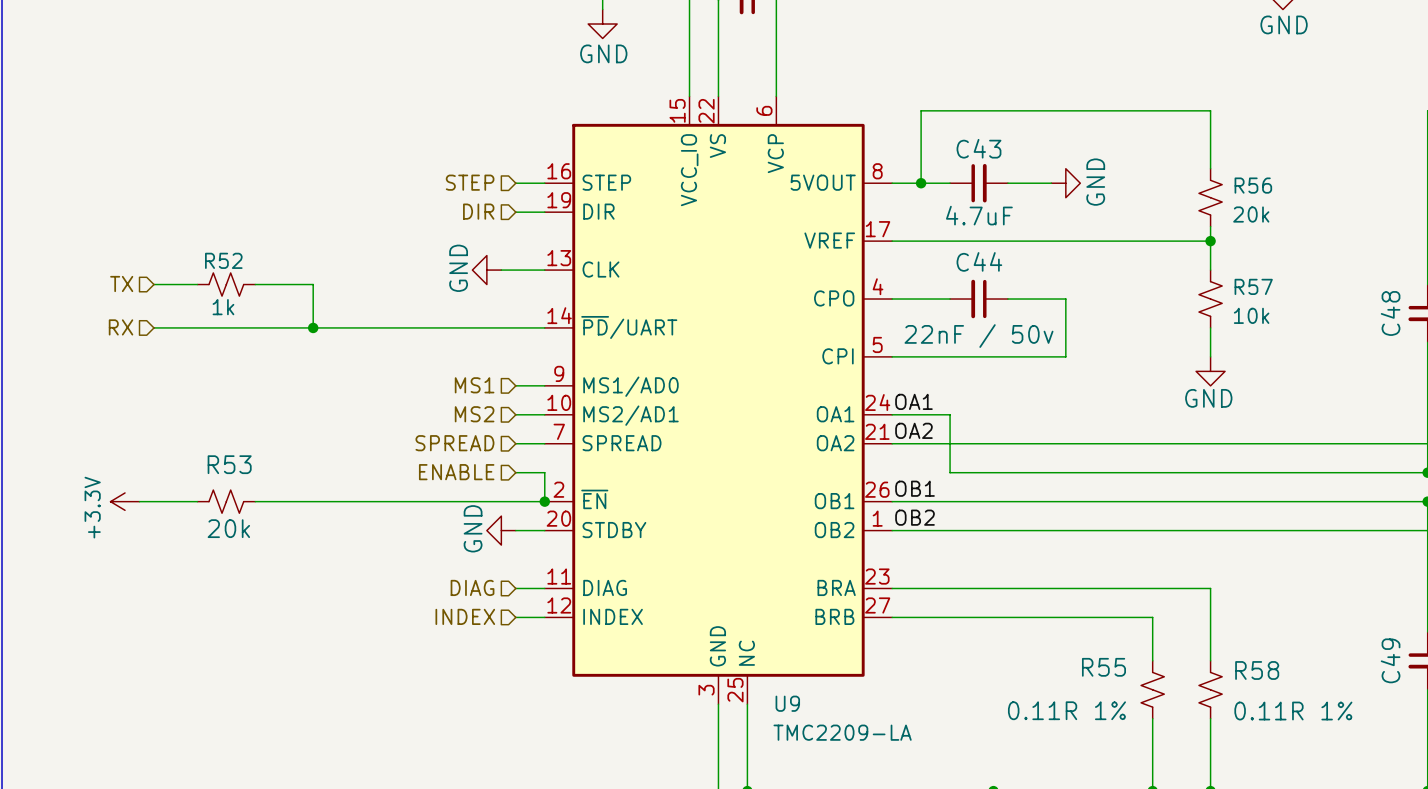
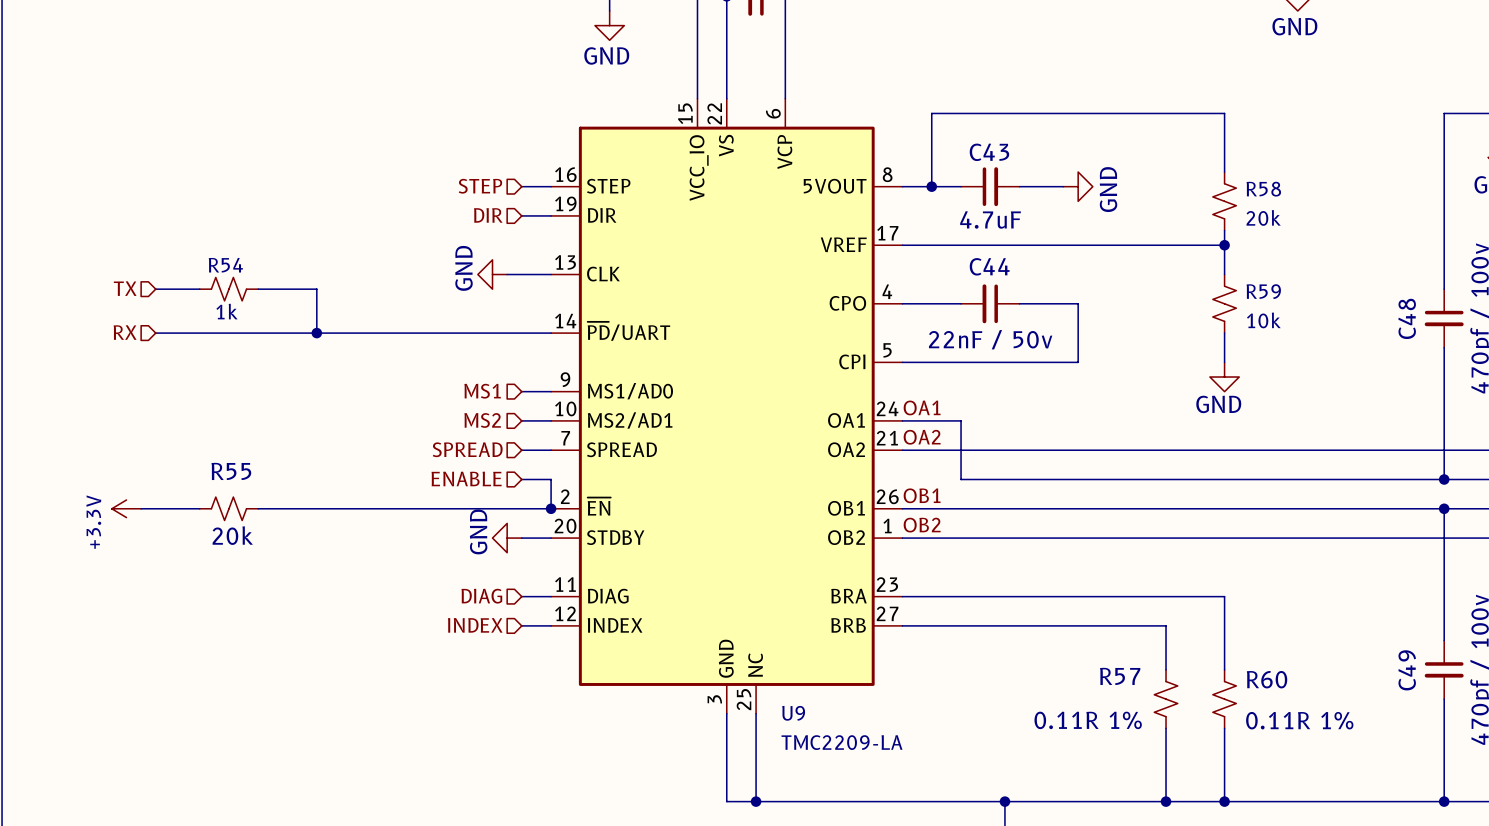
R56 name: R56 (1253, 185) -> R58 (1263, 189)
R52 name: R52 (223, 260) -> R54 (225, 265)
R57 name: R57 (1253, 286) -> R59 (1263, 291)
R53 name: R53 (229, 464) -> R55 (231, 471)
R55 name: R55 (1103, 667) -> R57 (1120, 676)
R58 name: R58 (1257, 670) -> R60 (1267, 679)

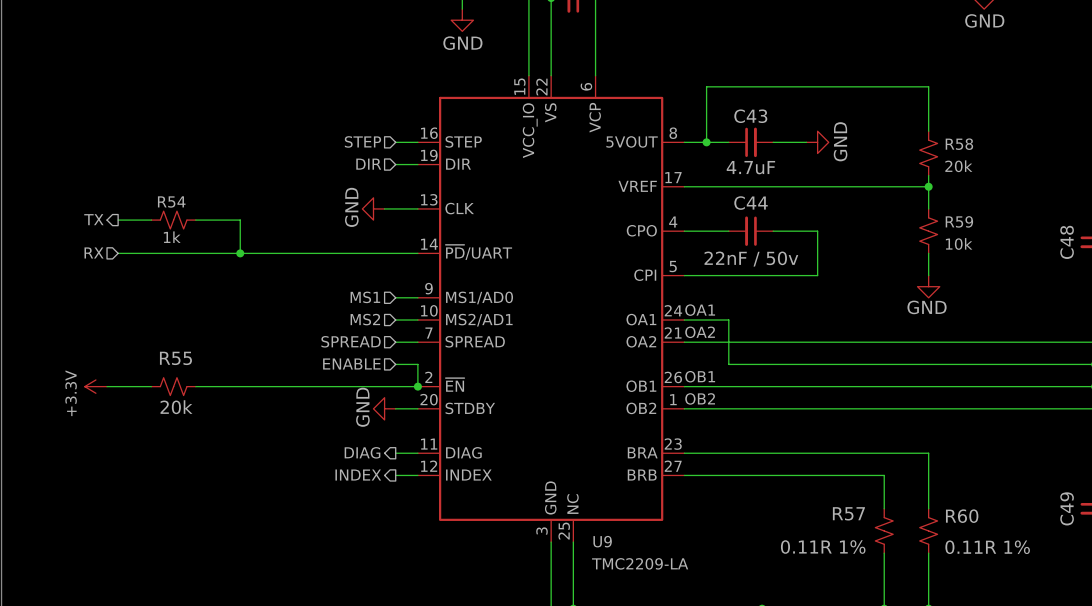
hierarchical label shape: input (125, 288) -> output (93, 219)
hierarchical label shape: input (481, 596) -> output (362, 452)
hierarchical label shape: input (475, 625) -> output (358, 475)

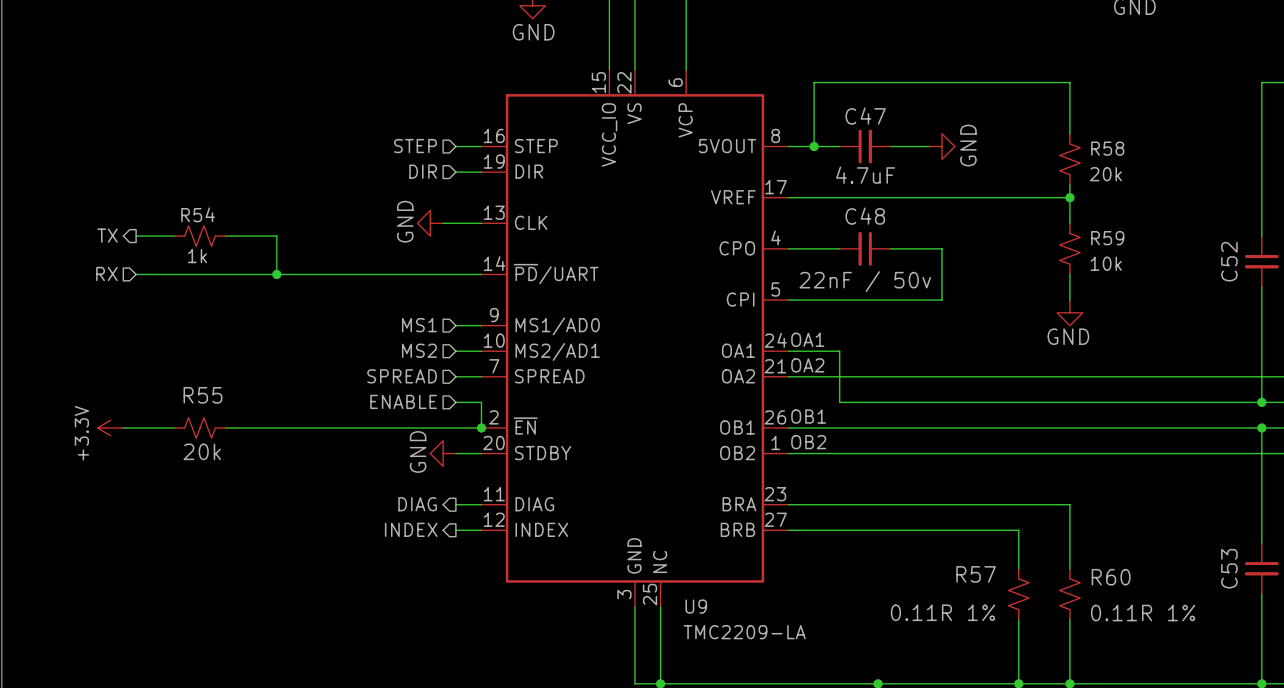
C43 name: C43 (750, 116) -> C47 (865, 116)
C44 name: C44 (751, 203) -> C48 (865, 216)
C48 name: C48 (1067, 242) -> C52 (1229, 261)
C49 name: C49 (1067, 508) -> C53 (1229, 568)

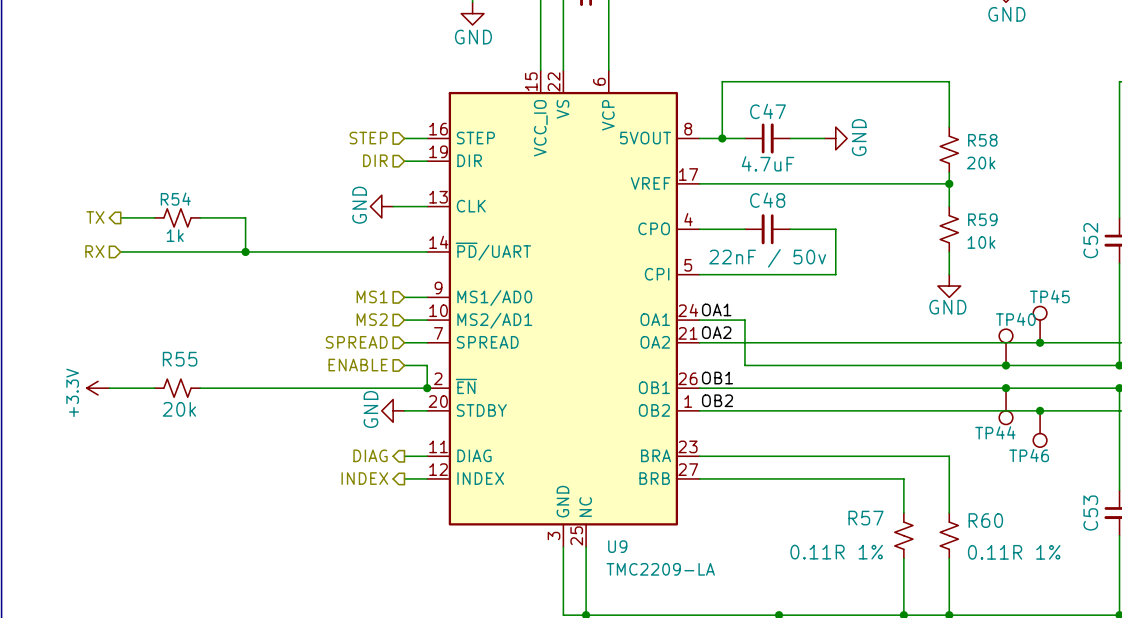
TP45: none -> (1040, 324)
junction: none -> (1040, 342)
TP40: none -> (1006, 347)
junction: none -> (1006, 365)
junction: none -> (1006, 388)
TP44: none -> (1006, 406)
junction: none -> (1040, 410)
TP46: none -> (1040, 429)

